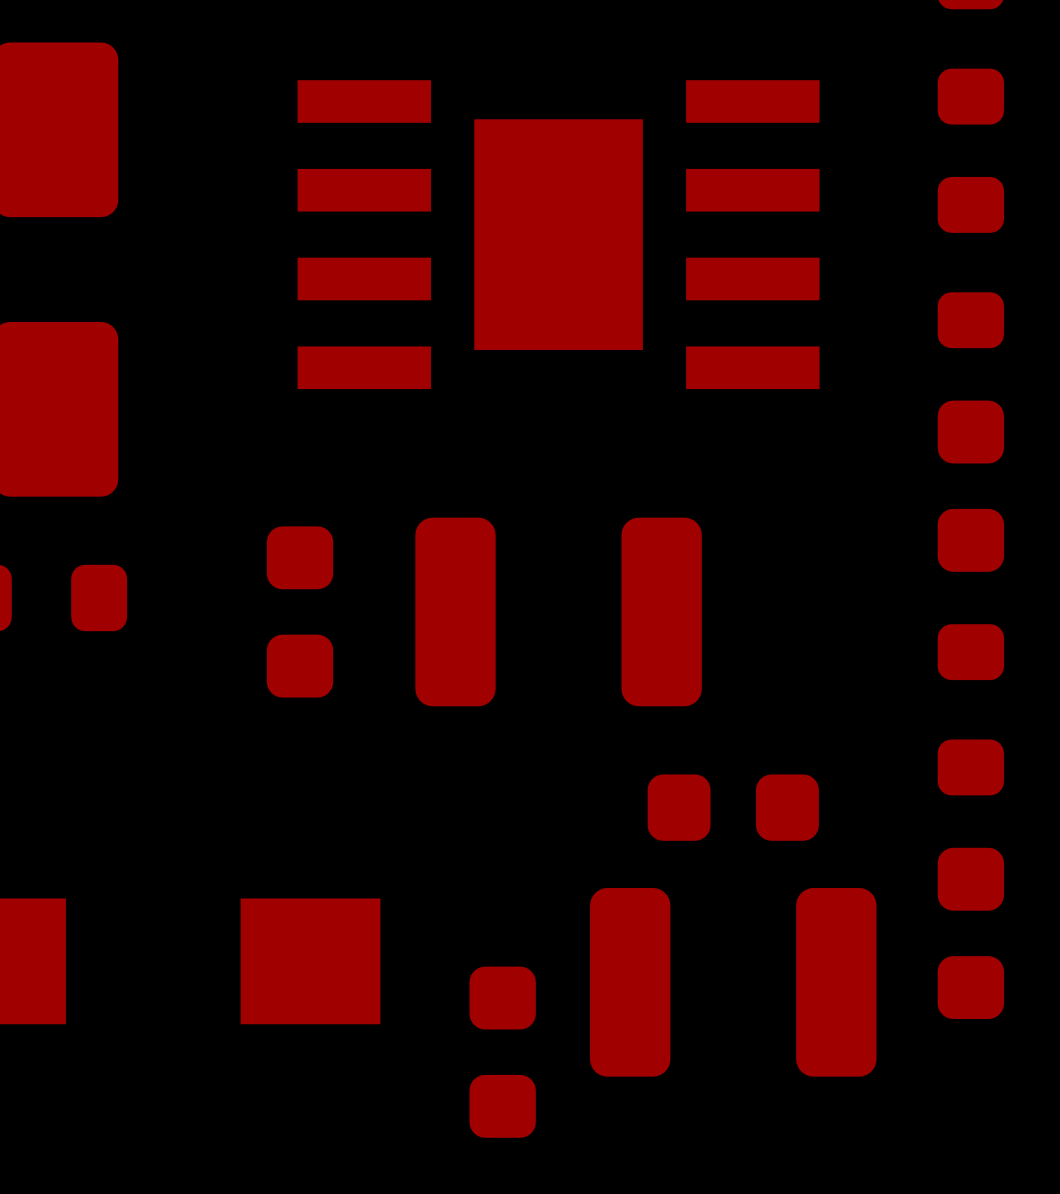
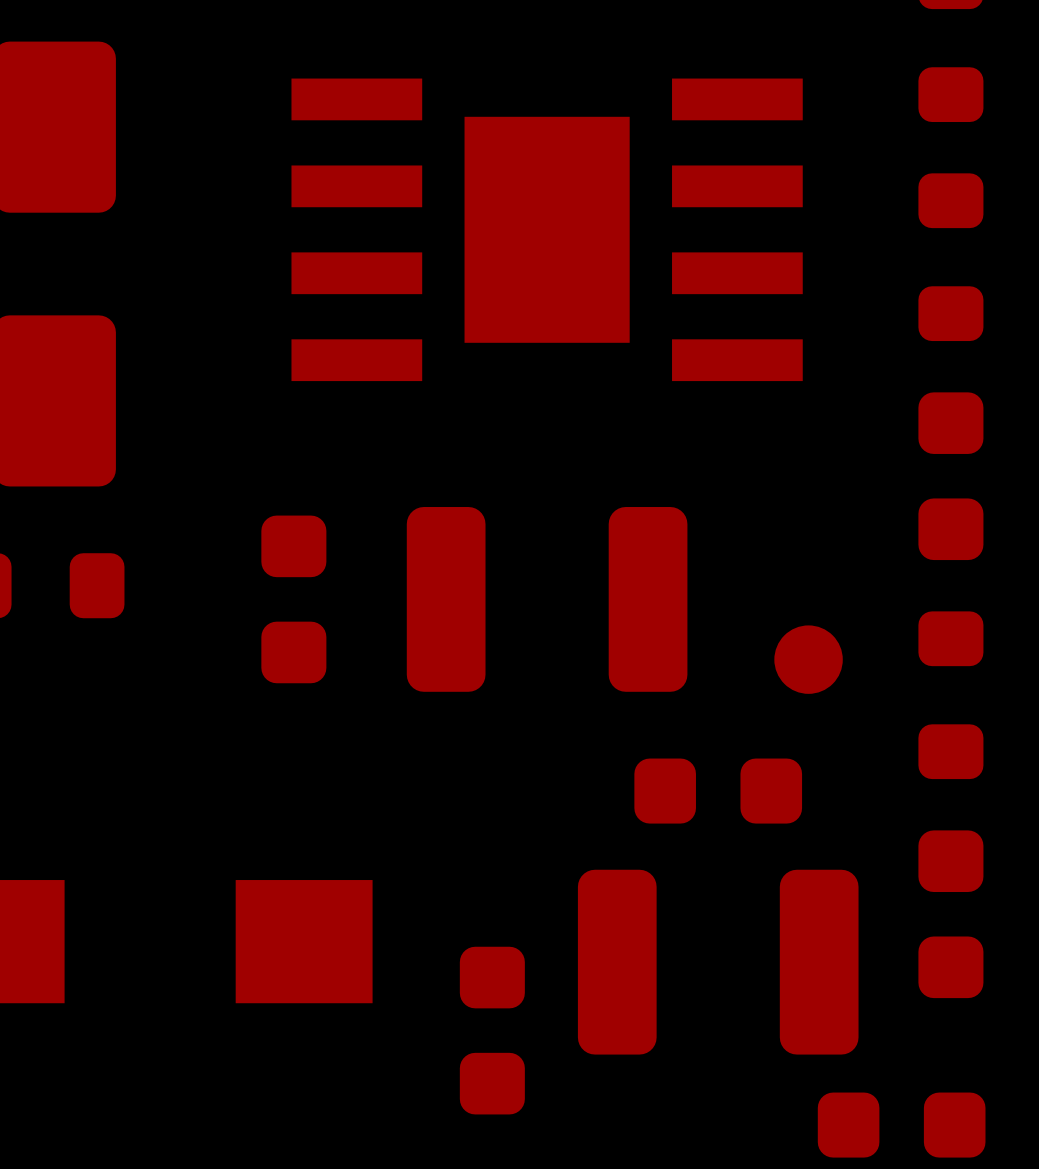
part: none -> (808, 659)
part: none -> (901, 1125)

